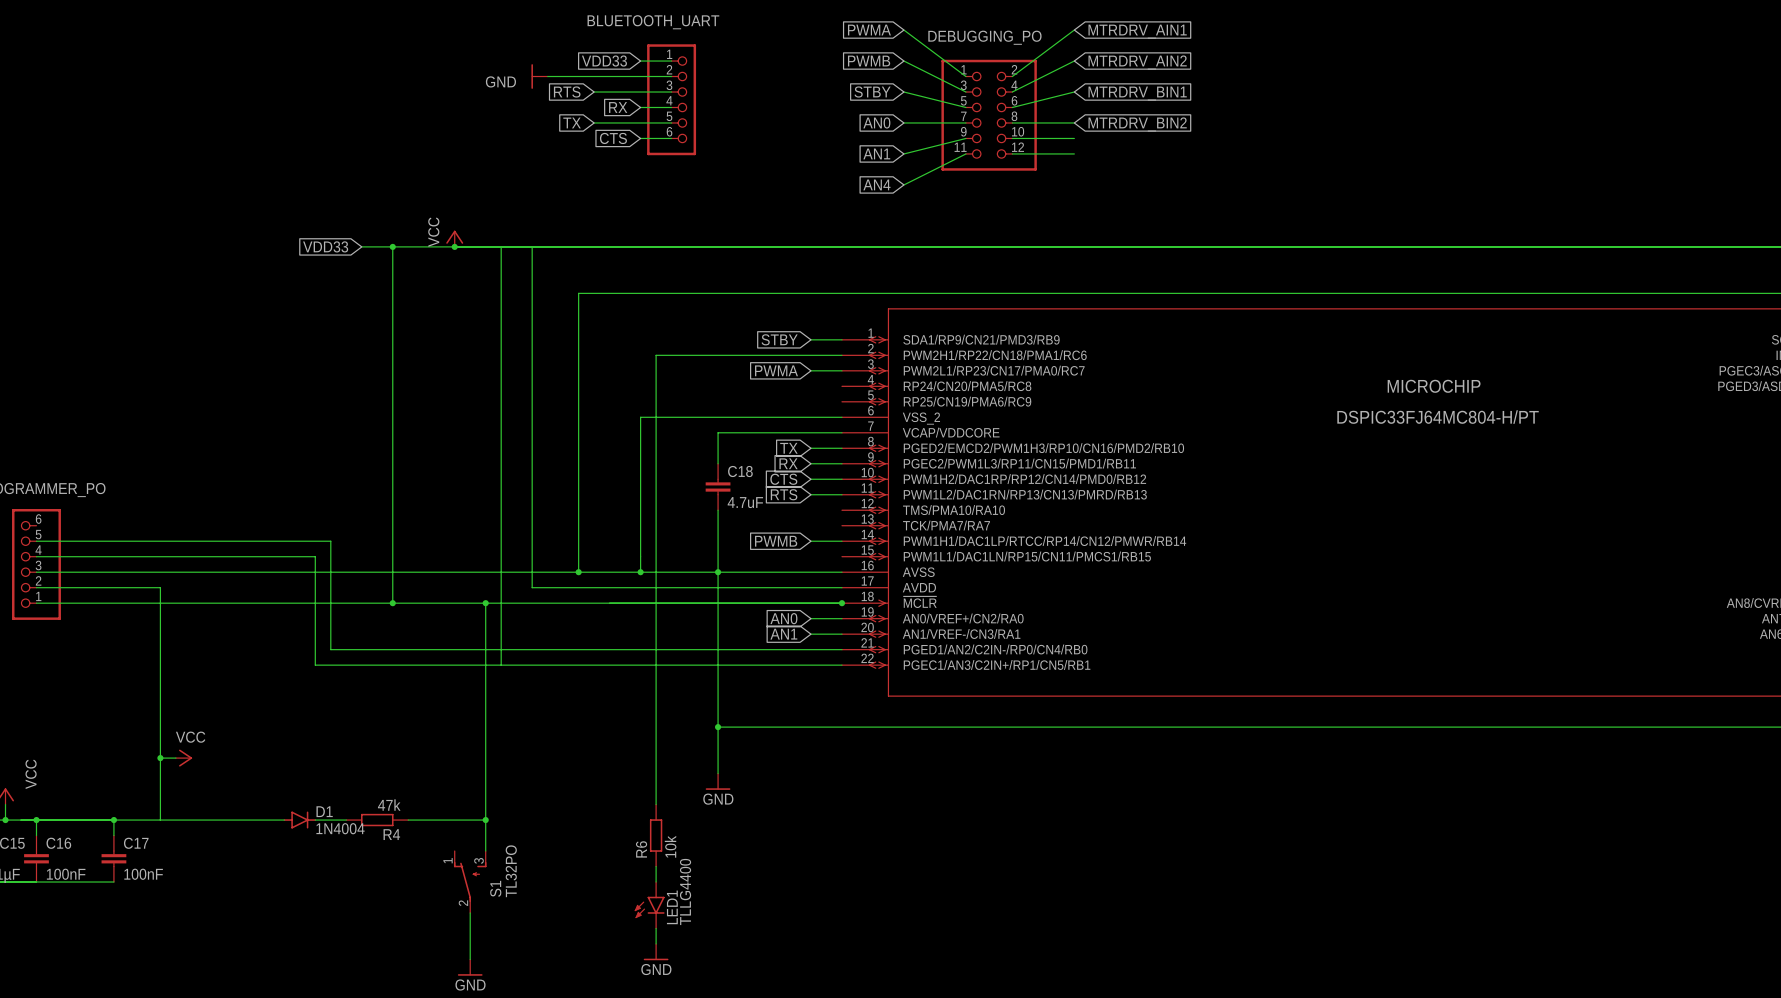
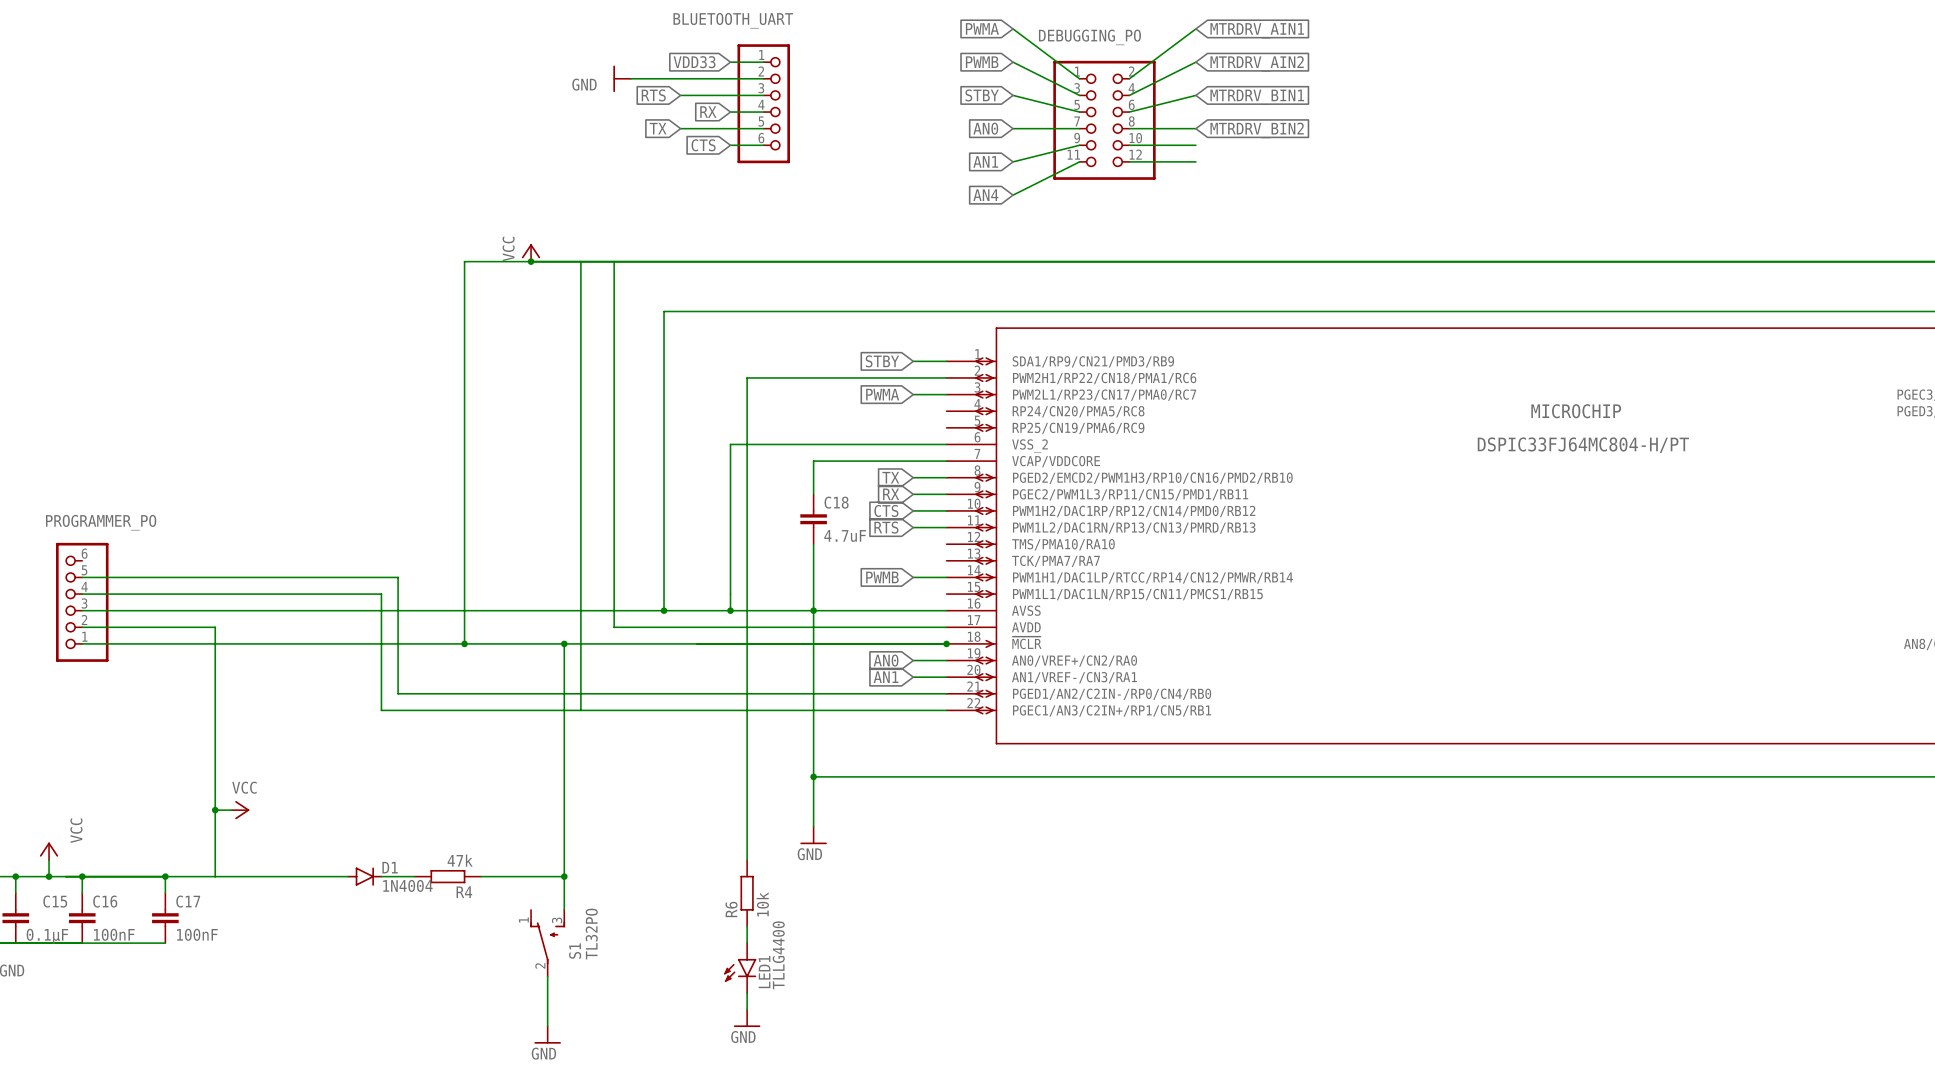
global label: VDD33 (325, 246) -> none
wire: (361, 246) (392, 246) -> none
junction: (392, 246) -> none

